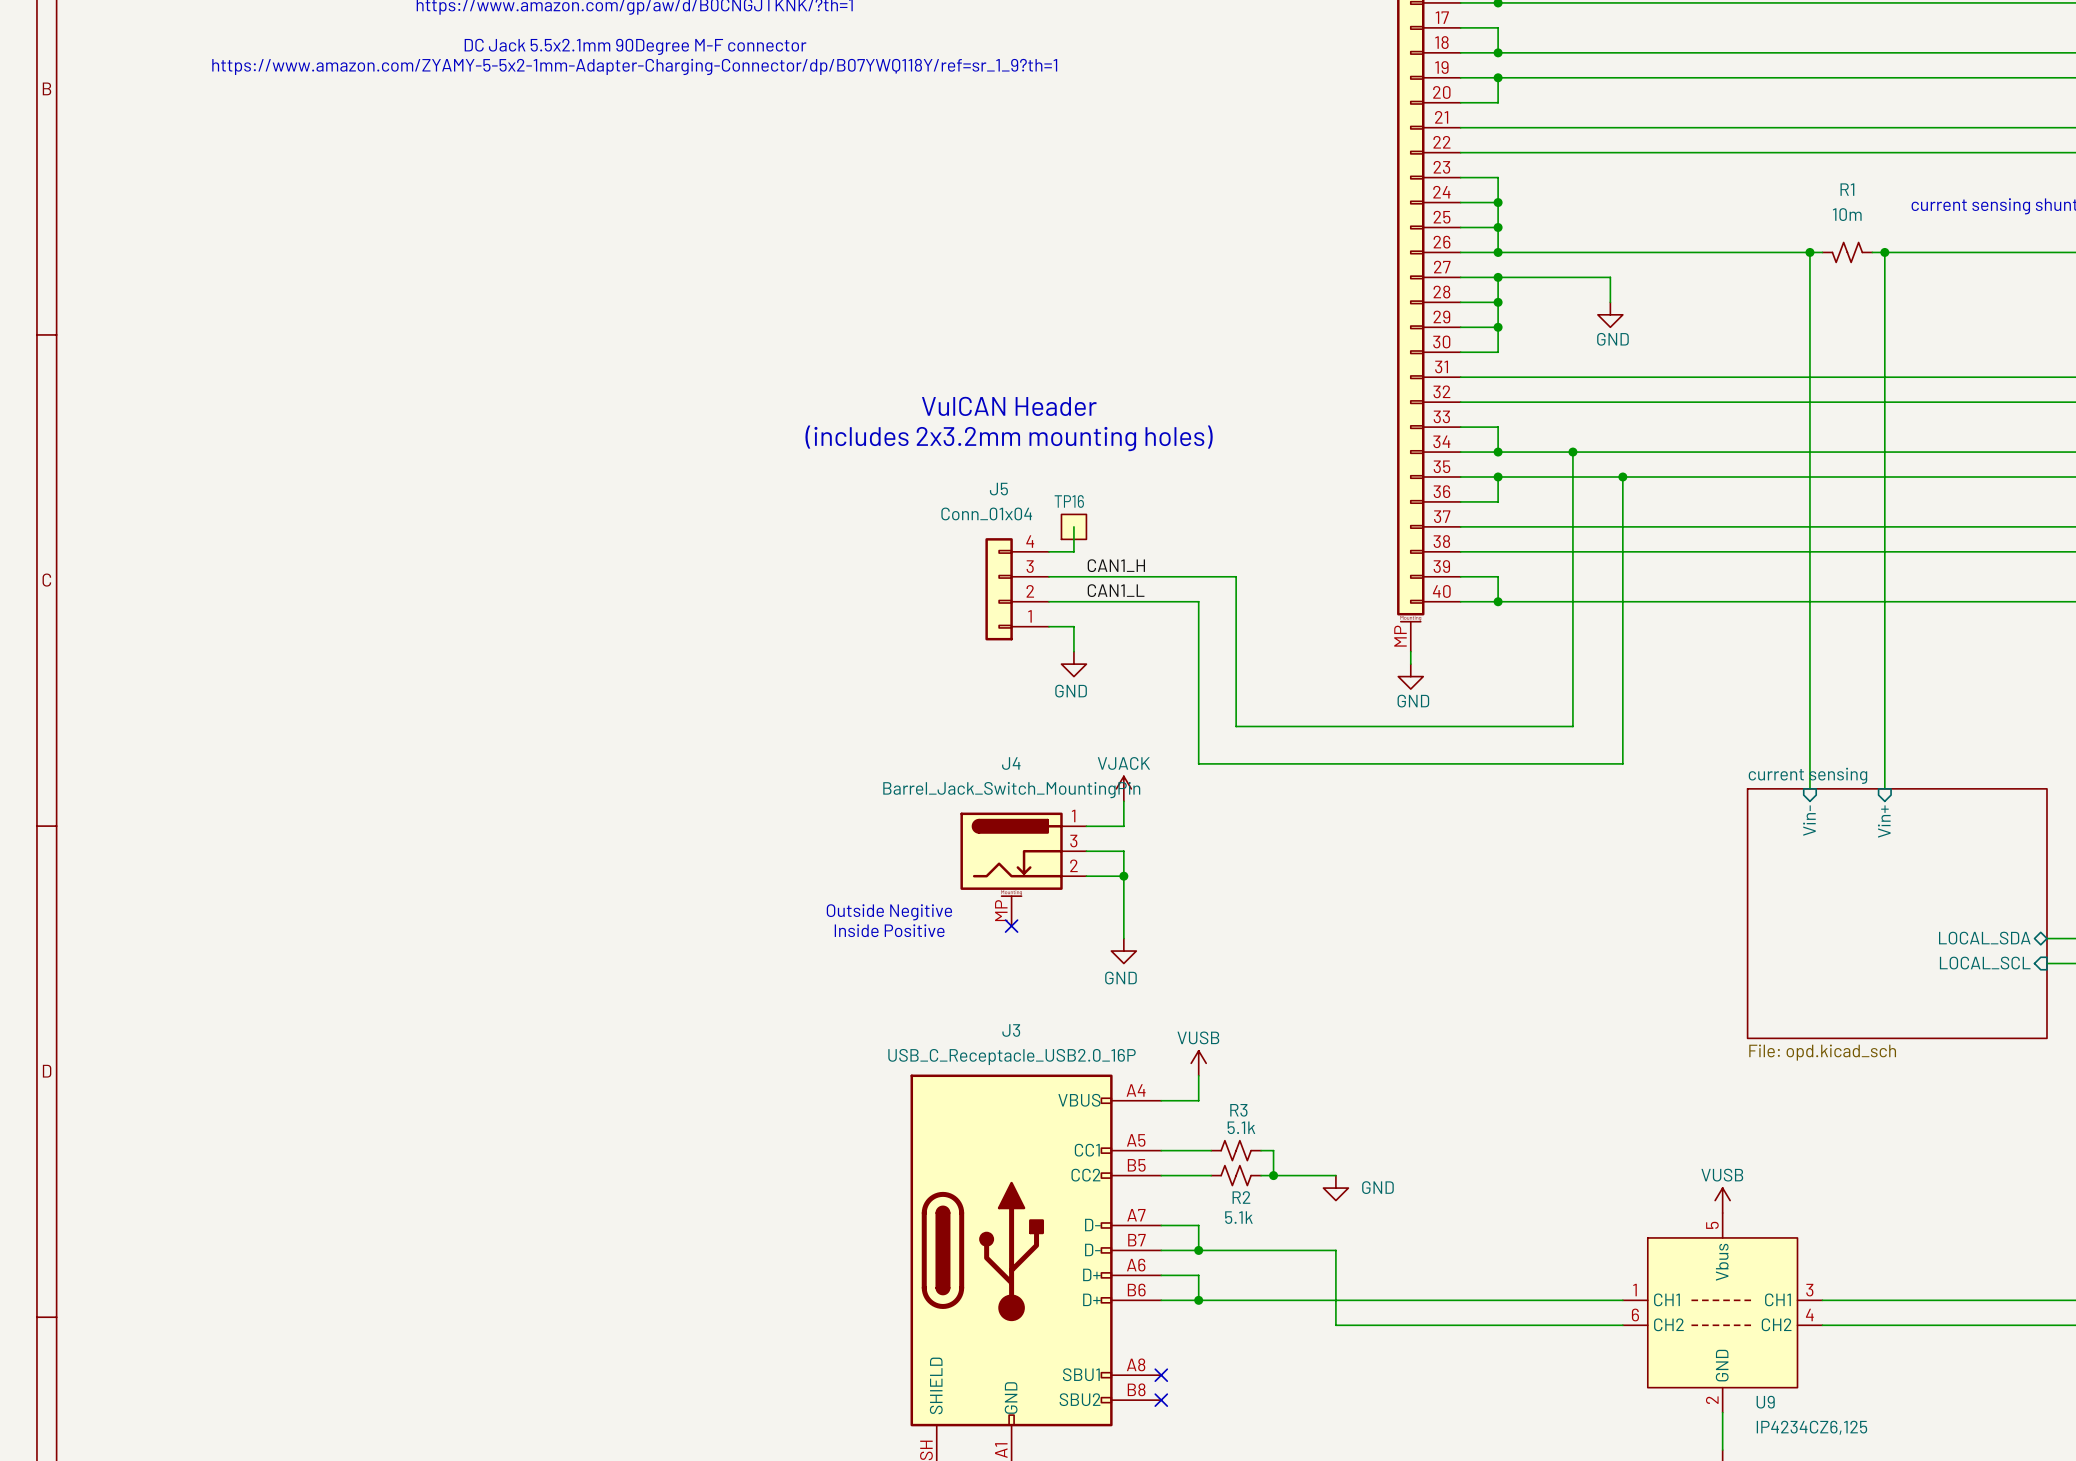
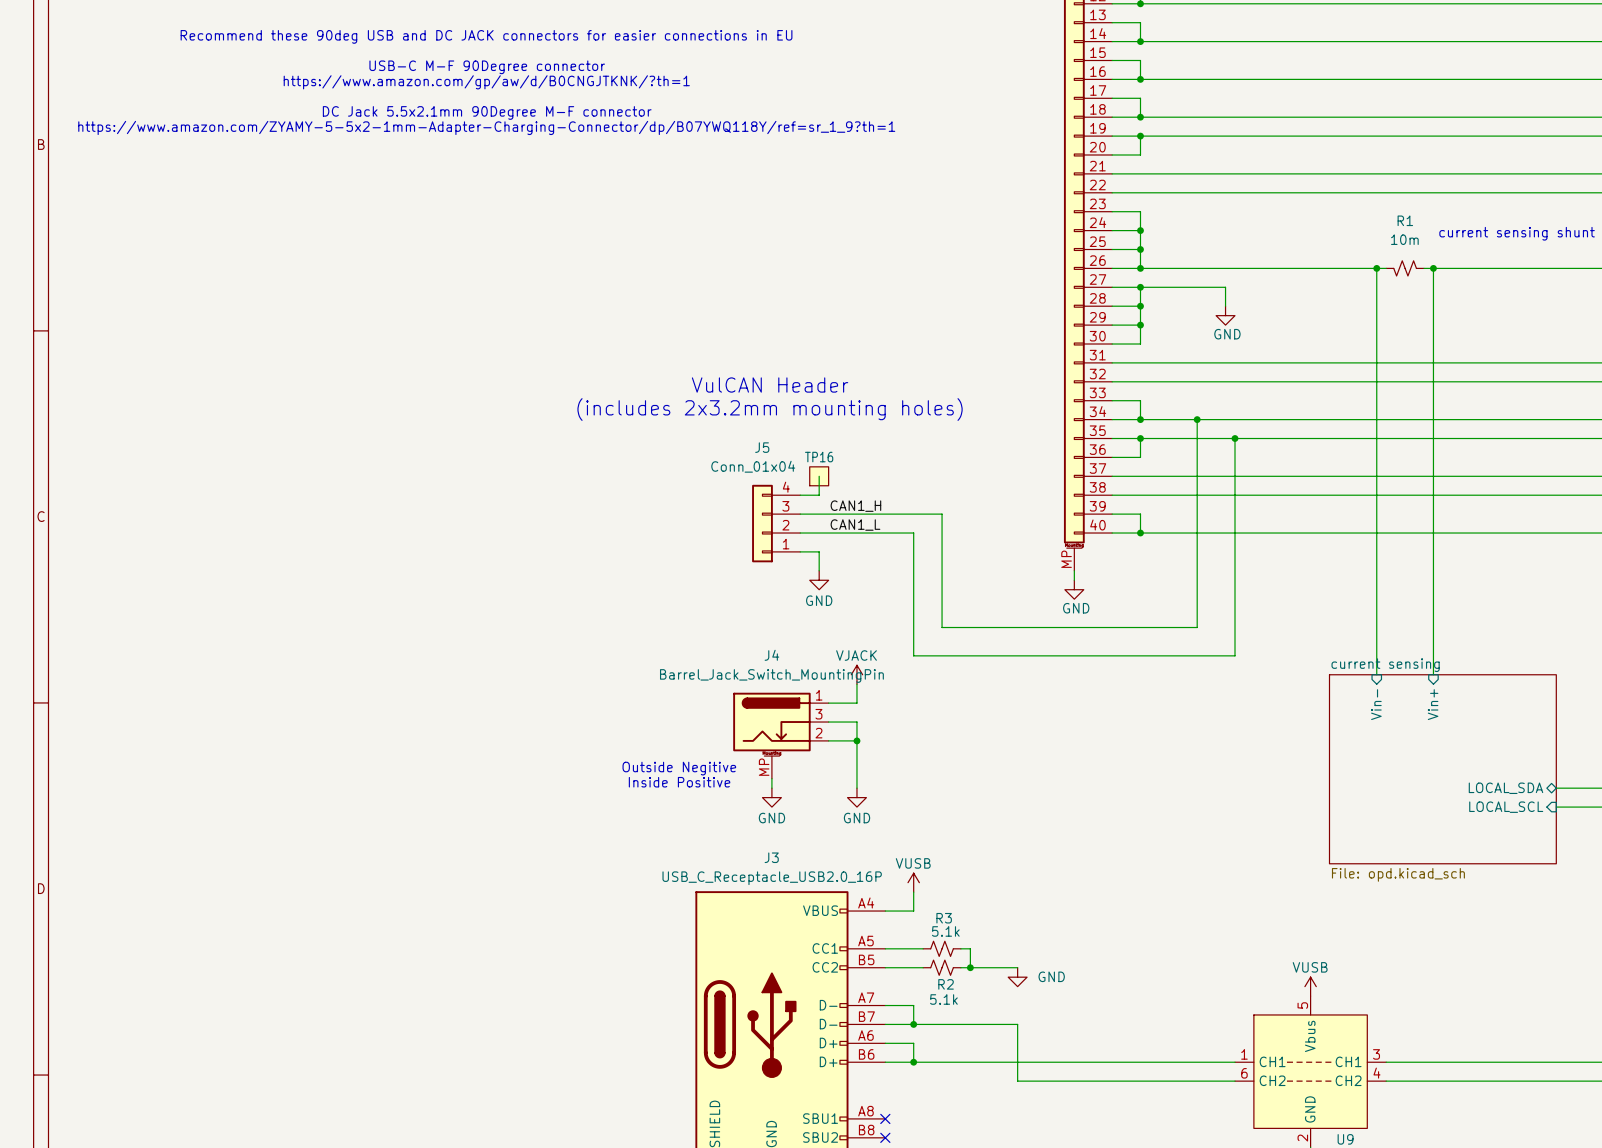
wire: none -> (771, 778) (771, 788)
no-connect mark: (1011, 926) -> none
power symbol: none -> GND (771, 797)

